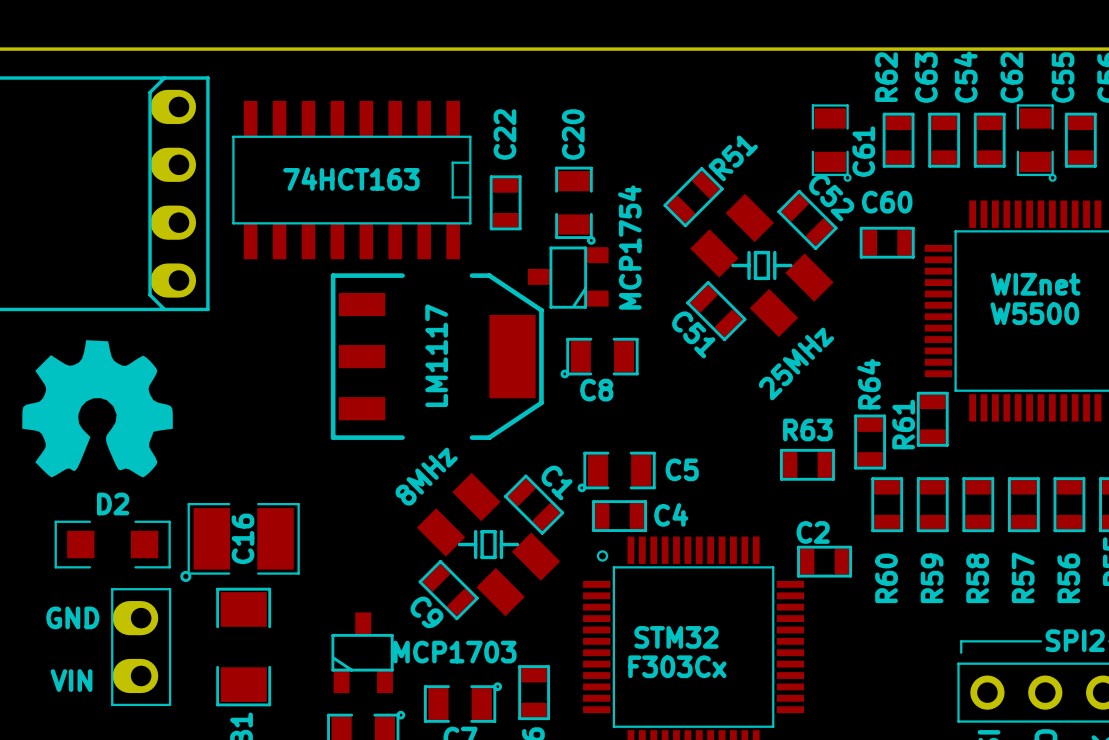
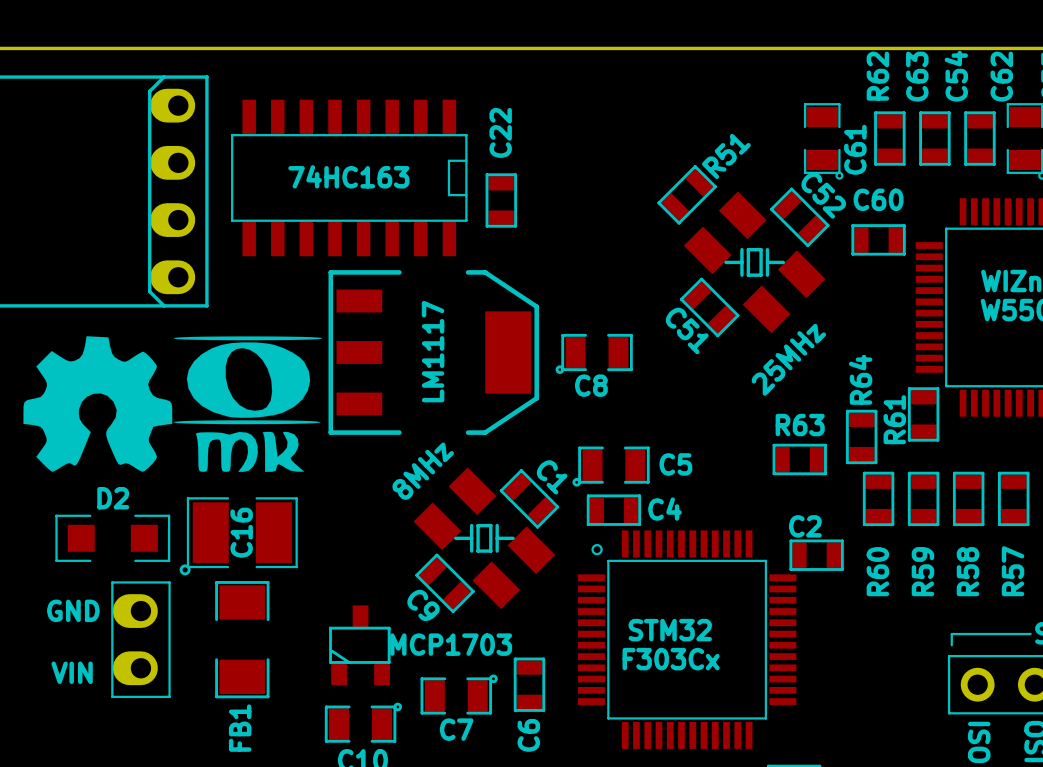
part value: 74HCT163 (351, 178) -> 74HC163 (348, 176)
C20: (575, 205) -> none
part: MCP1754 (568, 277) -> none
drawing: none -> [173, 336, 323, 472]

